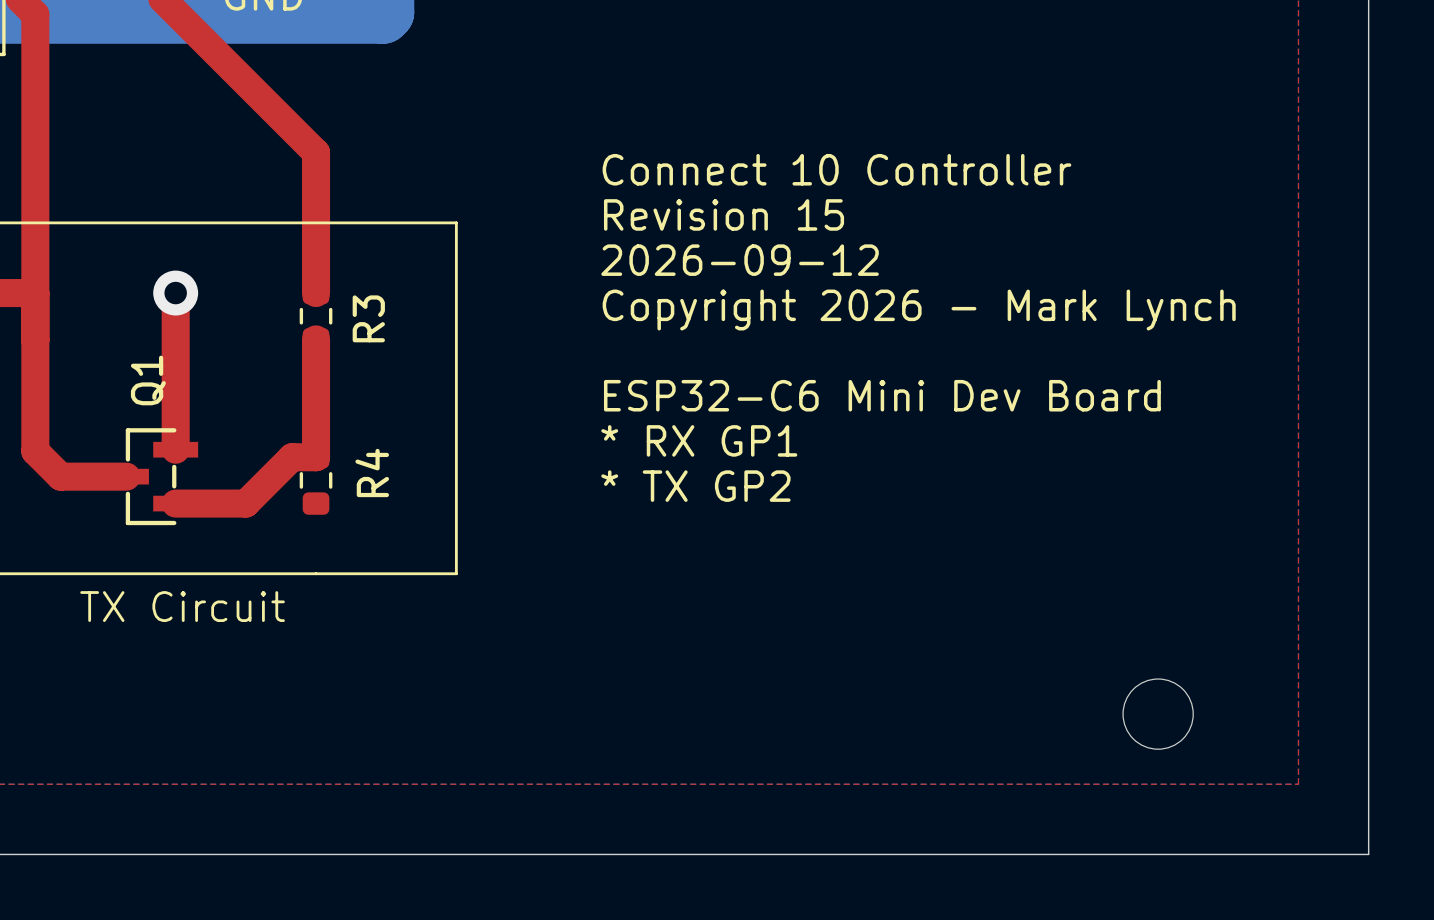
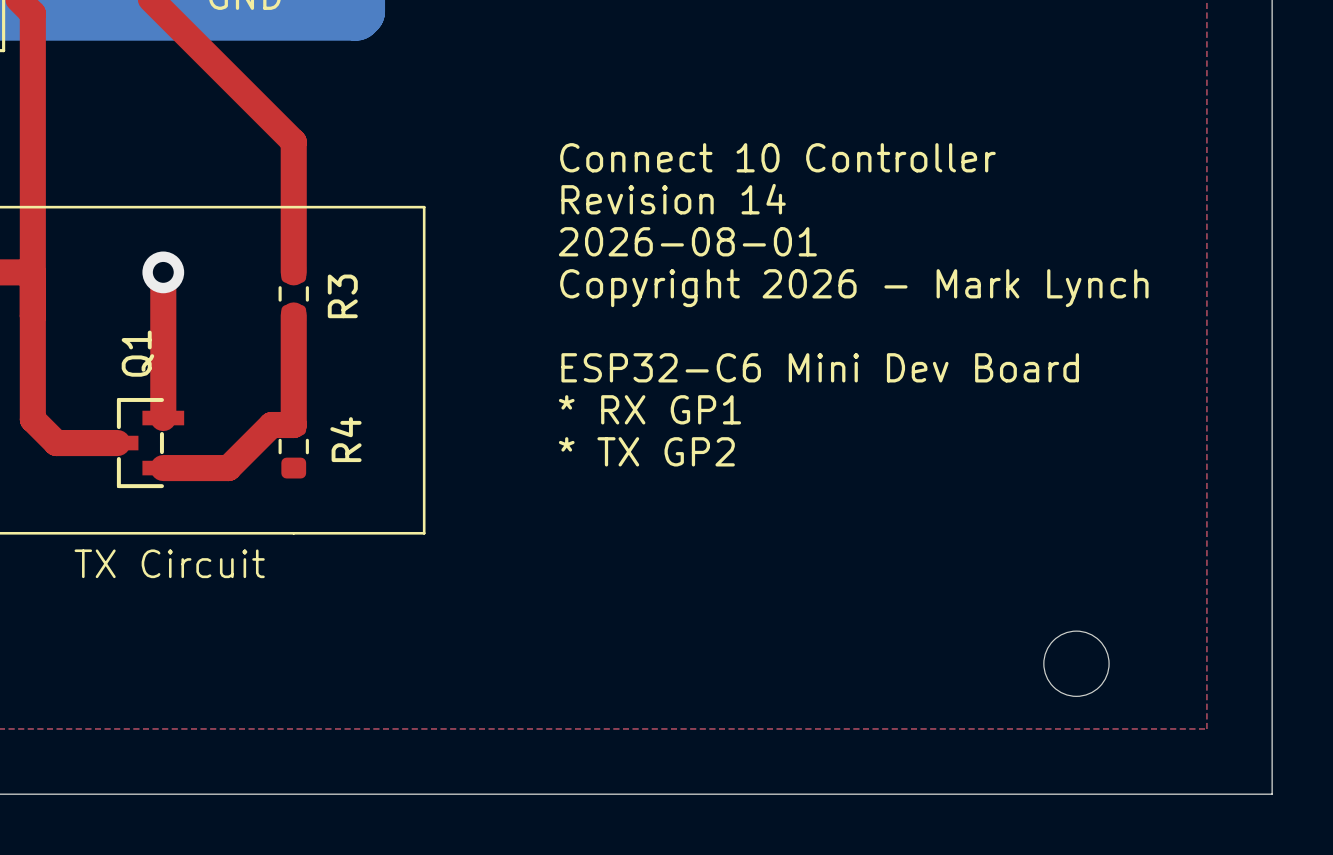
text: Revision 15 (724, 214) -> Revision 14 (673, 199)
text: 2026-09-12 (740, 260) -> 2026-08-01 (687, 241)

